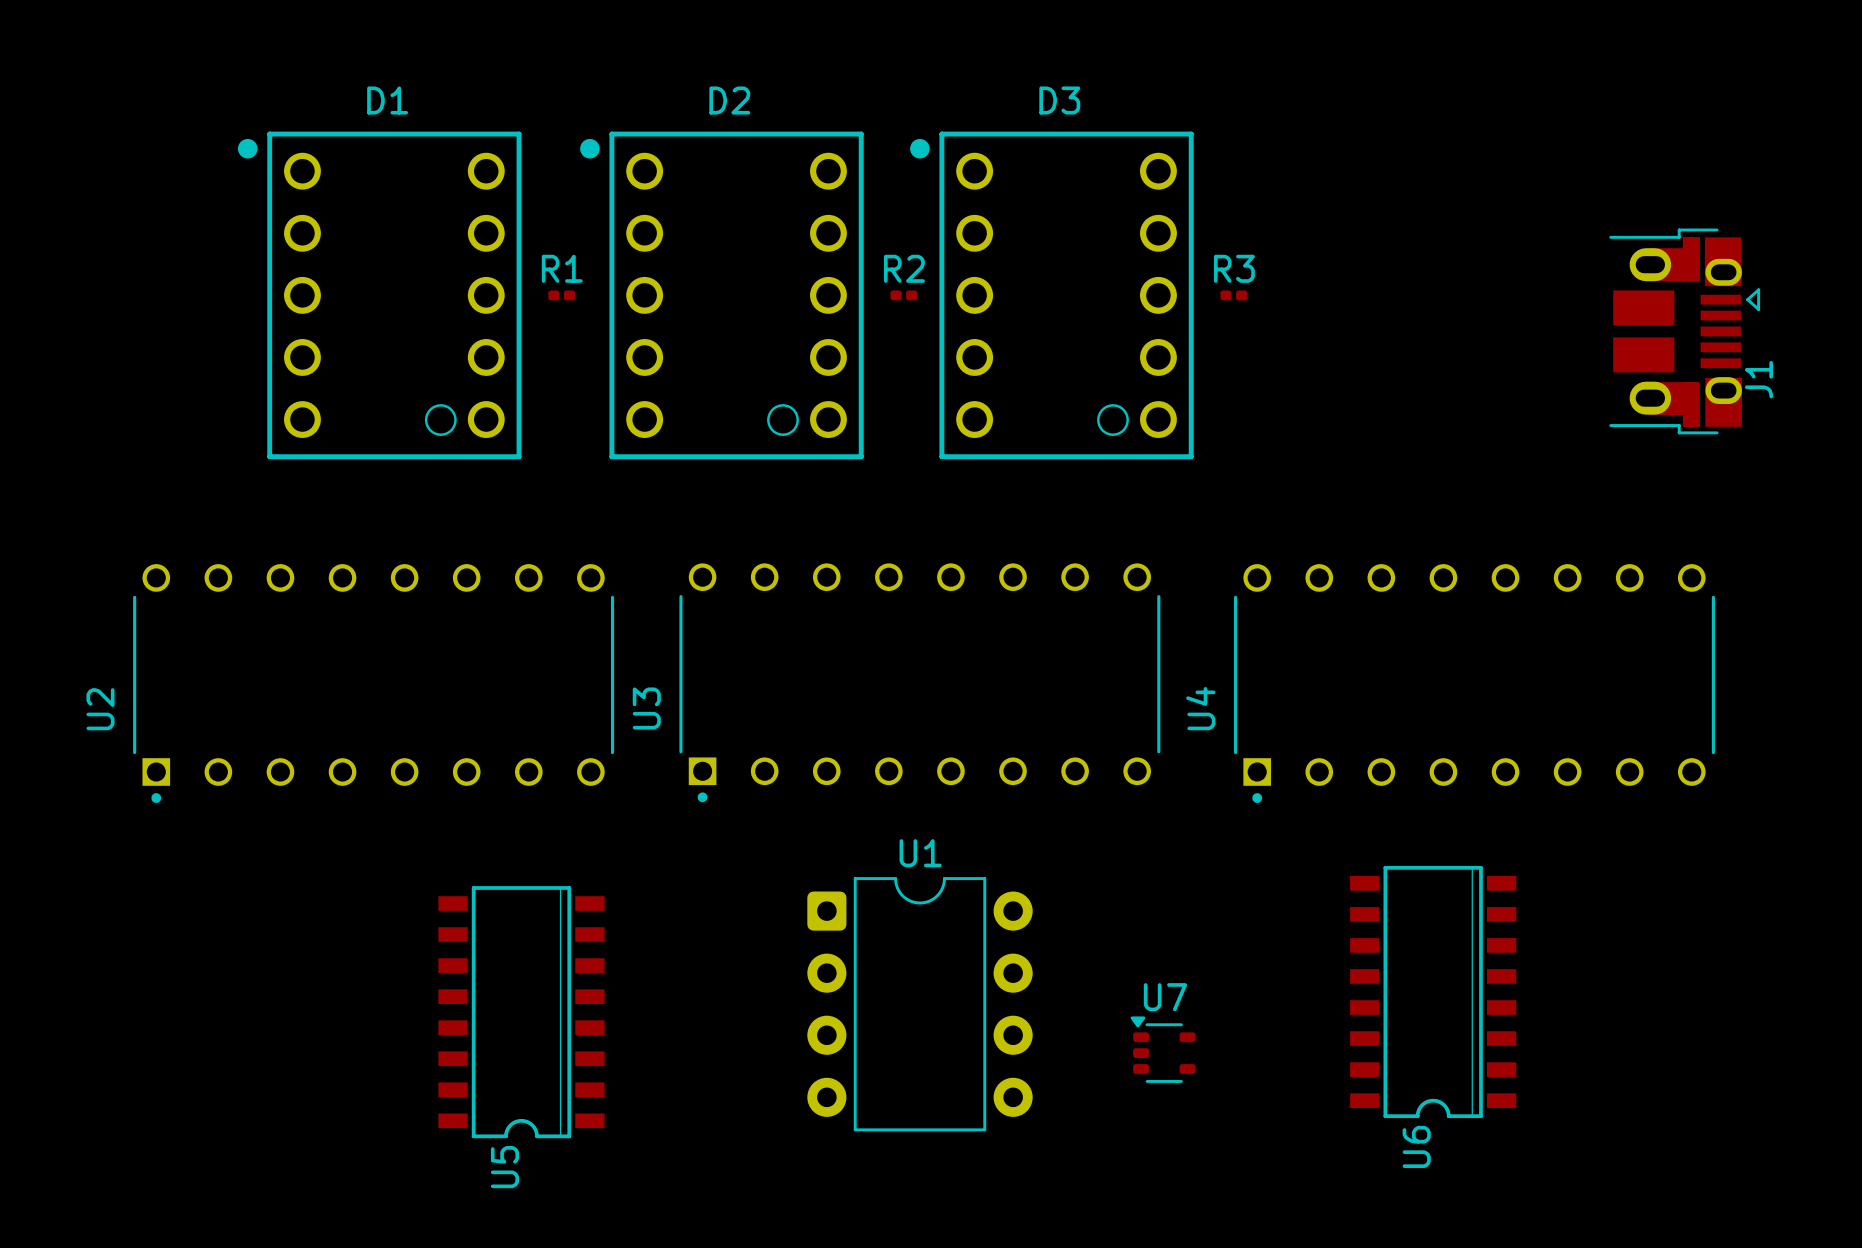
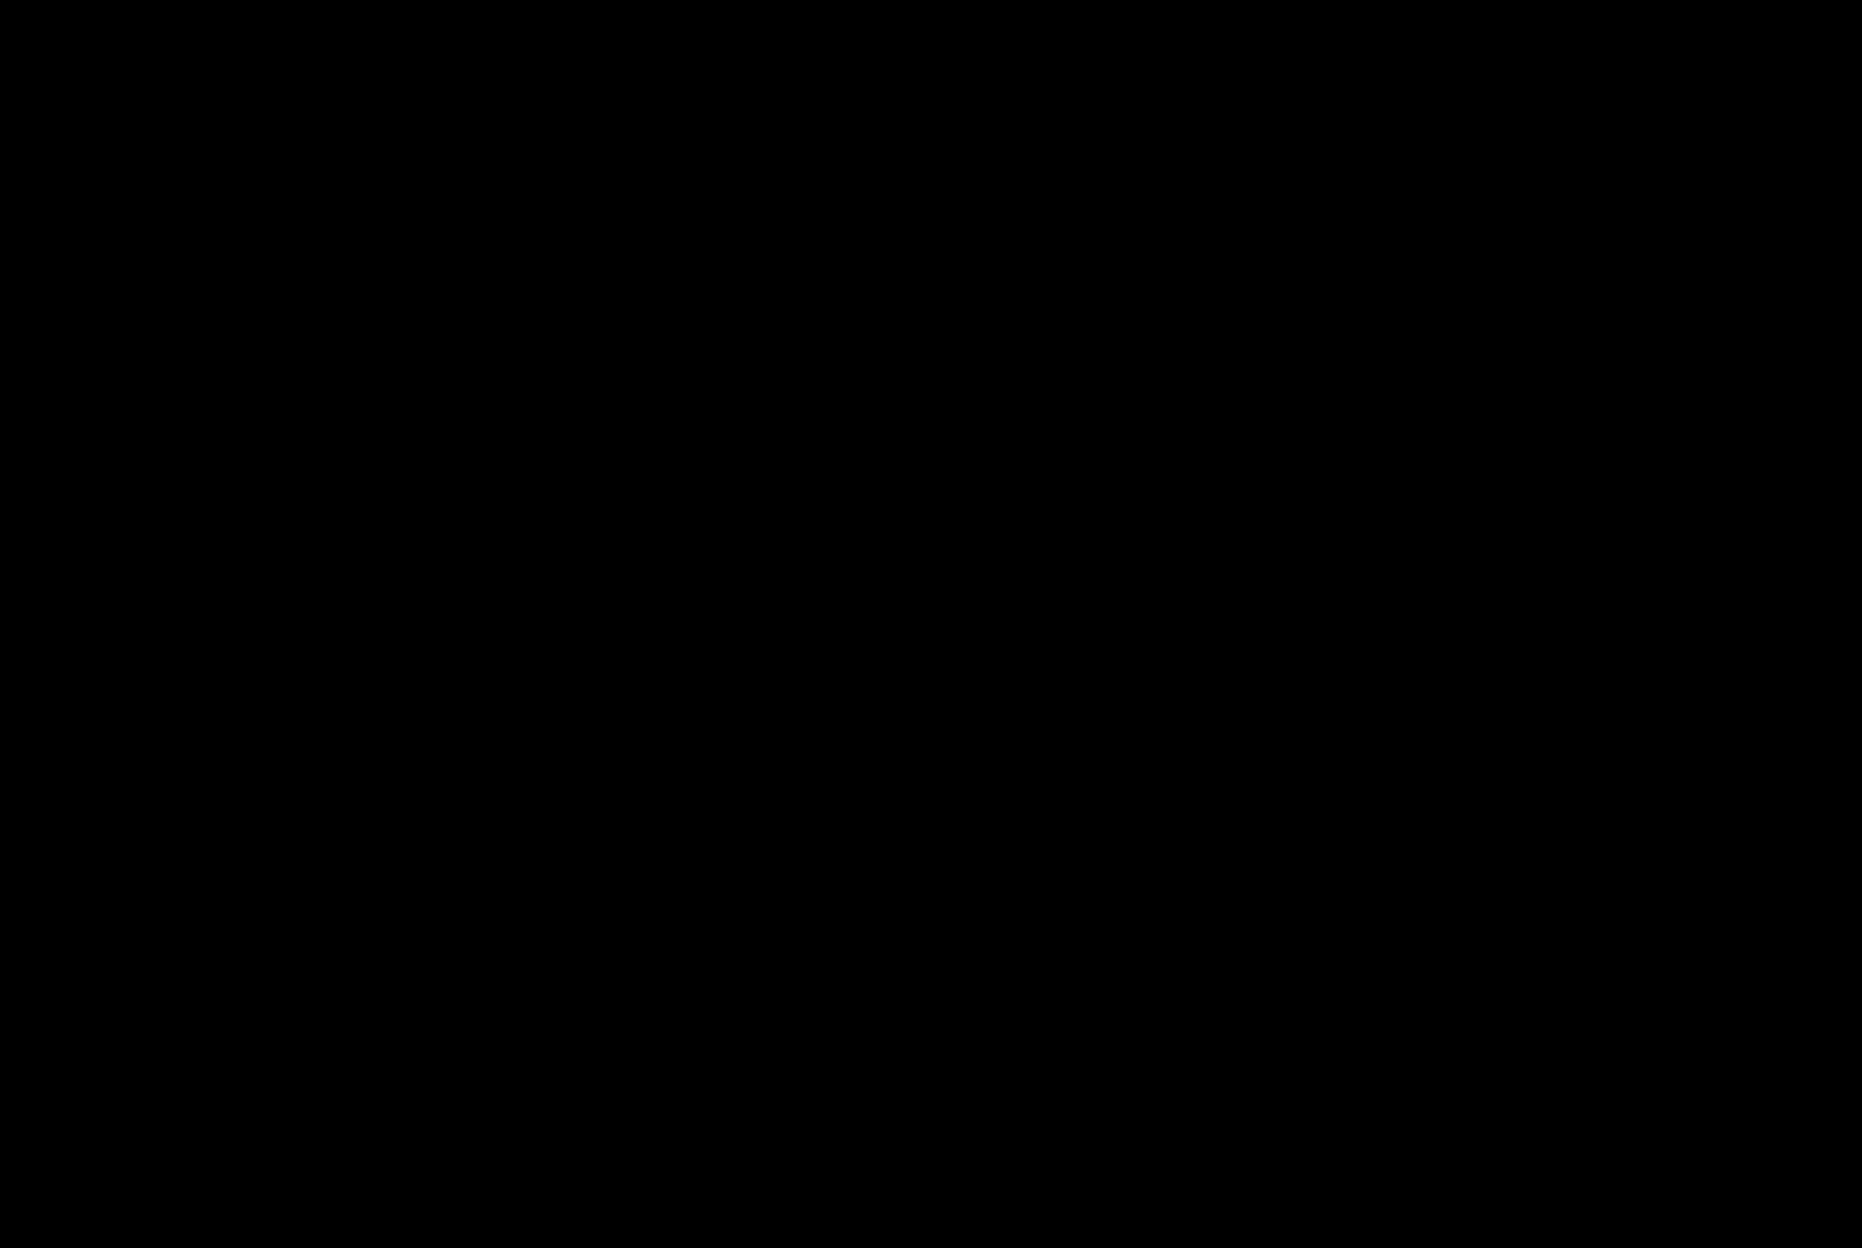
D1: (379, 295) -> none
R1: (561, 295) -> none
D2: (721, 295) -> none
R2: (903, 295) -> none
D3: (1051, 295) -> none
R3: (1233, 295) -> none
J1: (1684, 331) -> none
U3: (919, 682) -> none
U2: (373, 683) -> none
U4: (1474, 683) -> none
U6: (1433, 991) -> none
U1: (920, 1004) -> none
U5: (521, 1012) -> none
U7: (1163, 1049) -> none

